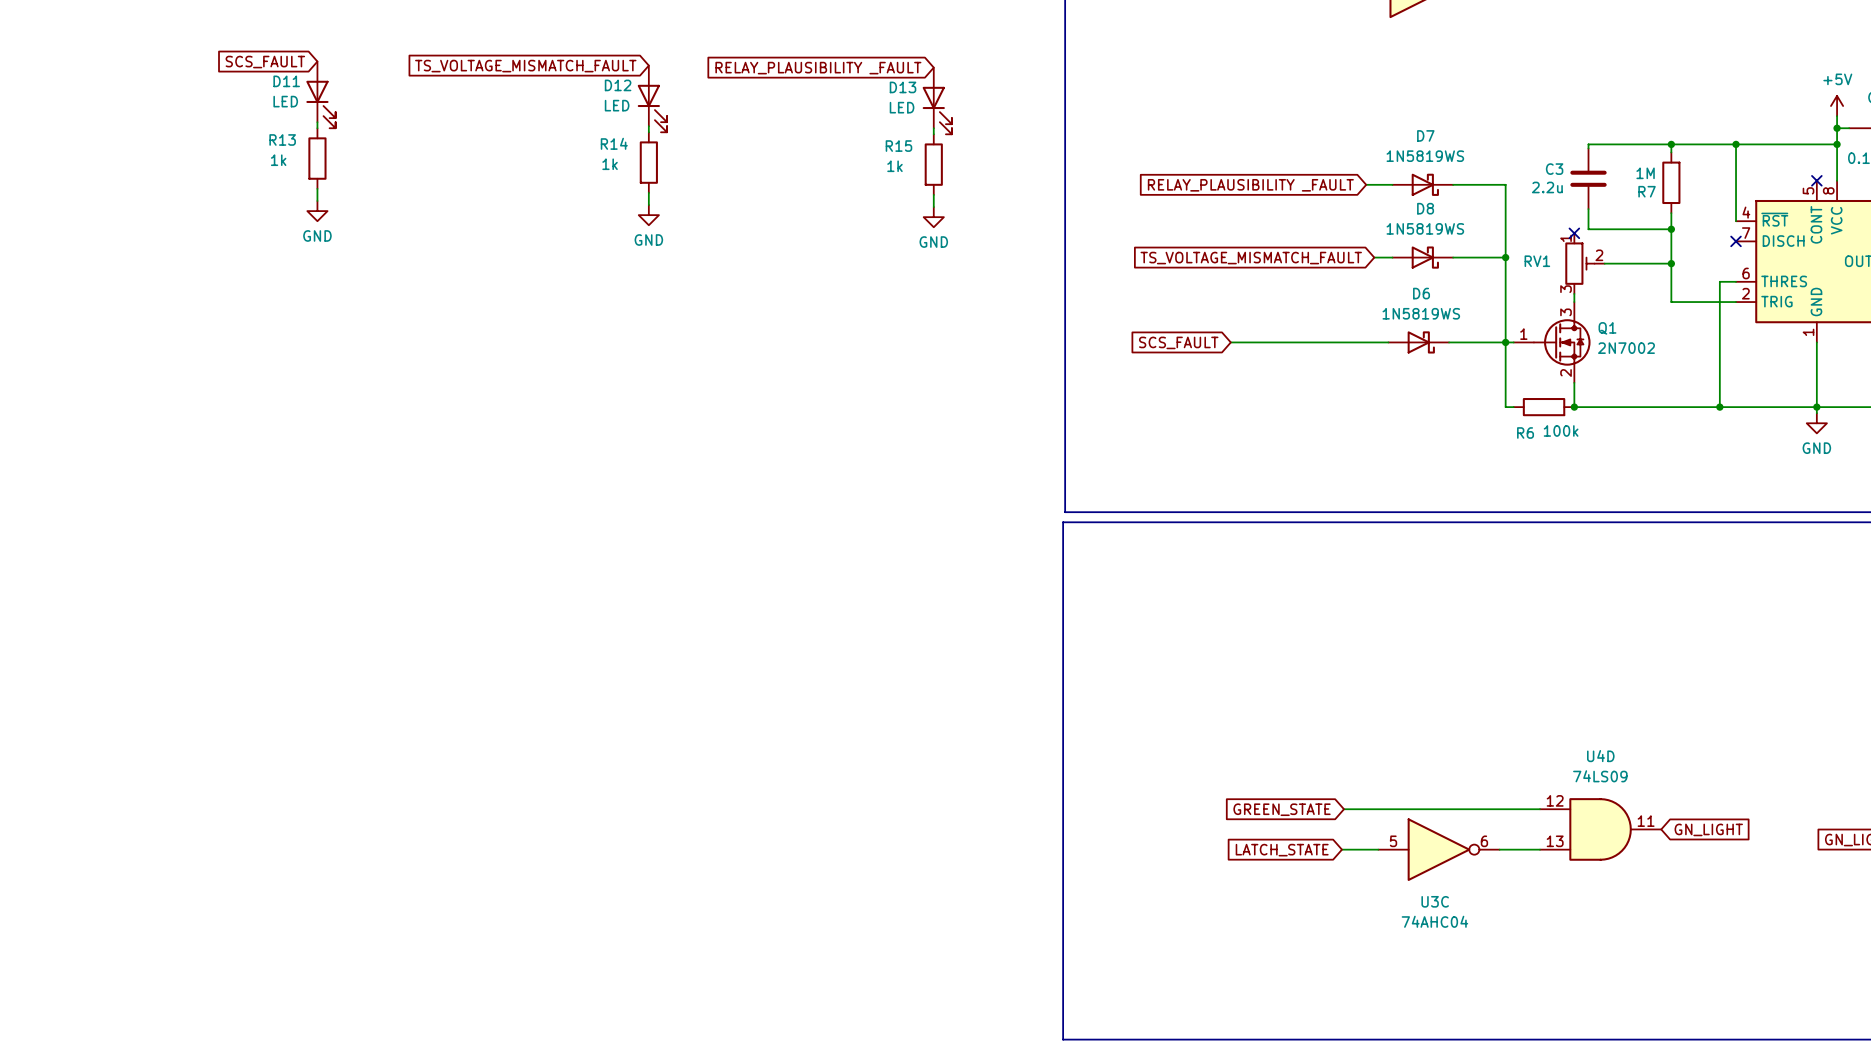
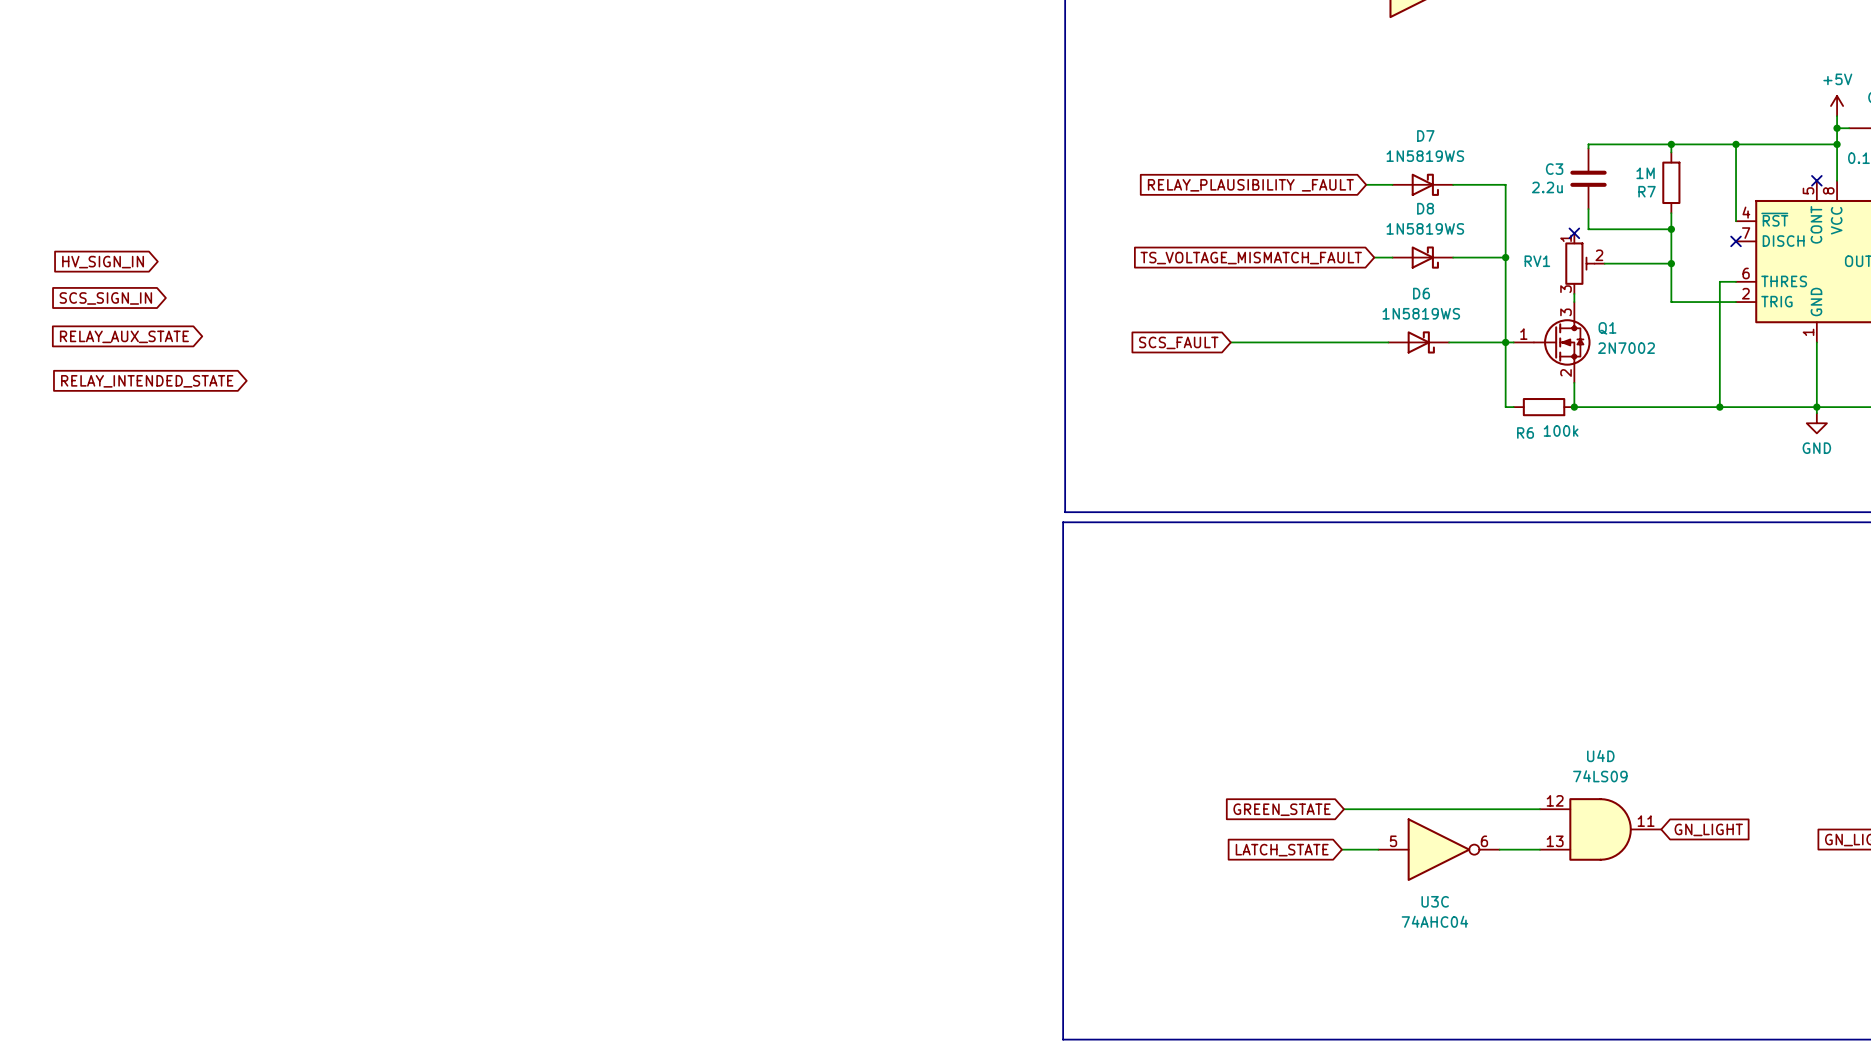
global label: SCS_FAULT (265, 62) -> none
global label: TS_VOLTAGE_MISMATCH_FAULT (525, 66) -> none
global label: RELAY_PLAUSIBILITY _FAULT (818, 68) -> none
D11: LED (320, 94) -> none
D12: LED (652, 98) -> none
D13: LED (937, 100) -> none
wire: (317, 122) (317, 128) -> none
wire: (648, 126) (648, 132) -> none
wire: (933, 128) (933, 134) -> none
R13: 1k (317, 158) -> none
R14: 1k (648, 162) -> none
R15: 1k (933, 164) -> none
wire: (317, 188) (317, 200) -> none
wire: (648, 192) (648, 205) -> none
wire: (933, 194) (933, 207) -> none
power symbol: GND (317, 211) -> none
power symbol: GND (648, 215) -> none
power symbol: GND (933, 217) -> none
global label: none -> HV_SIGN_IN (103, 262)
global label: none -> SCS_SIGN_IN (105, 298)
global label: none -> RELAY_AUX_STATE (124, 336)
global label: none -> RELAY_INTENDED_STATE (147, 381)

